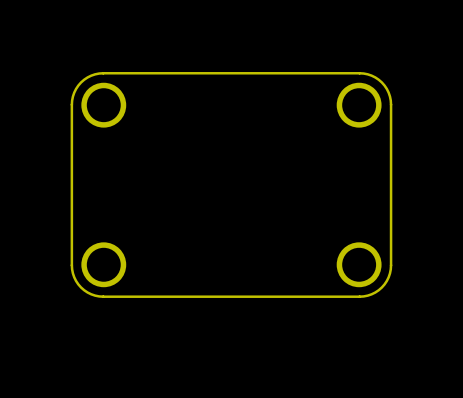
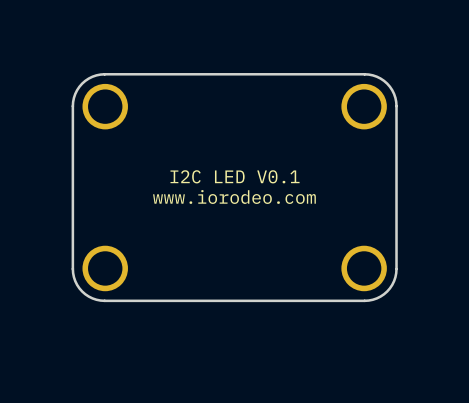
text: none -> I2C LED V0.1 (235, 176)
text: none -> www.iorodeo.com (234, 196)

